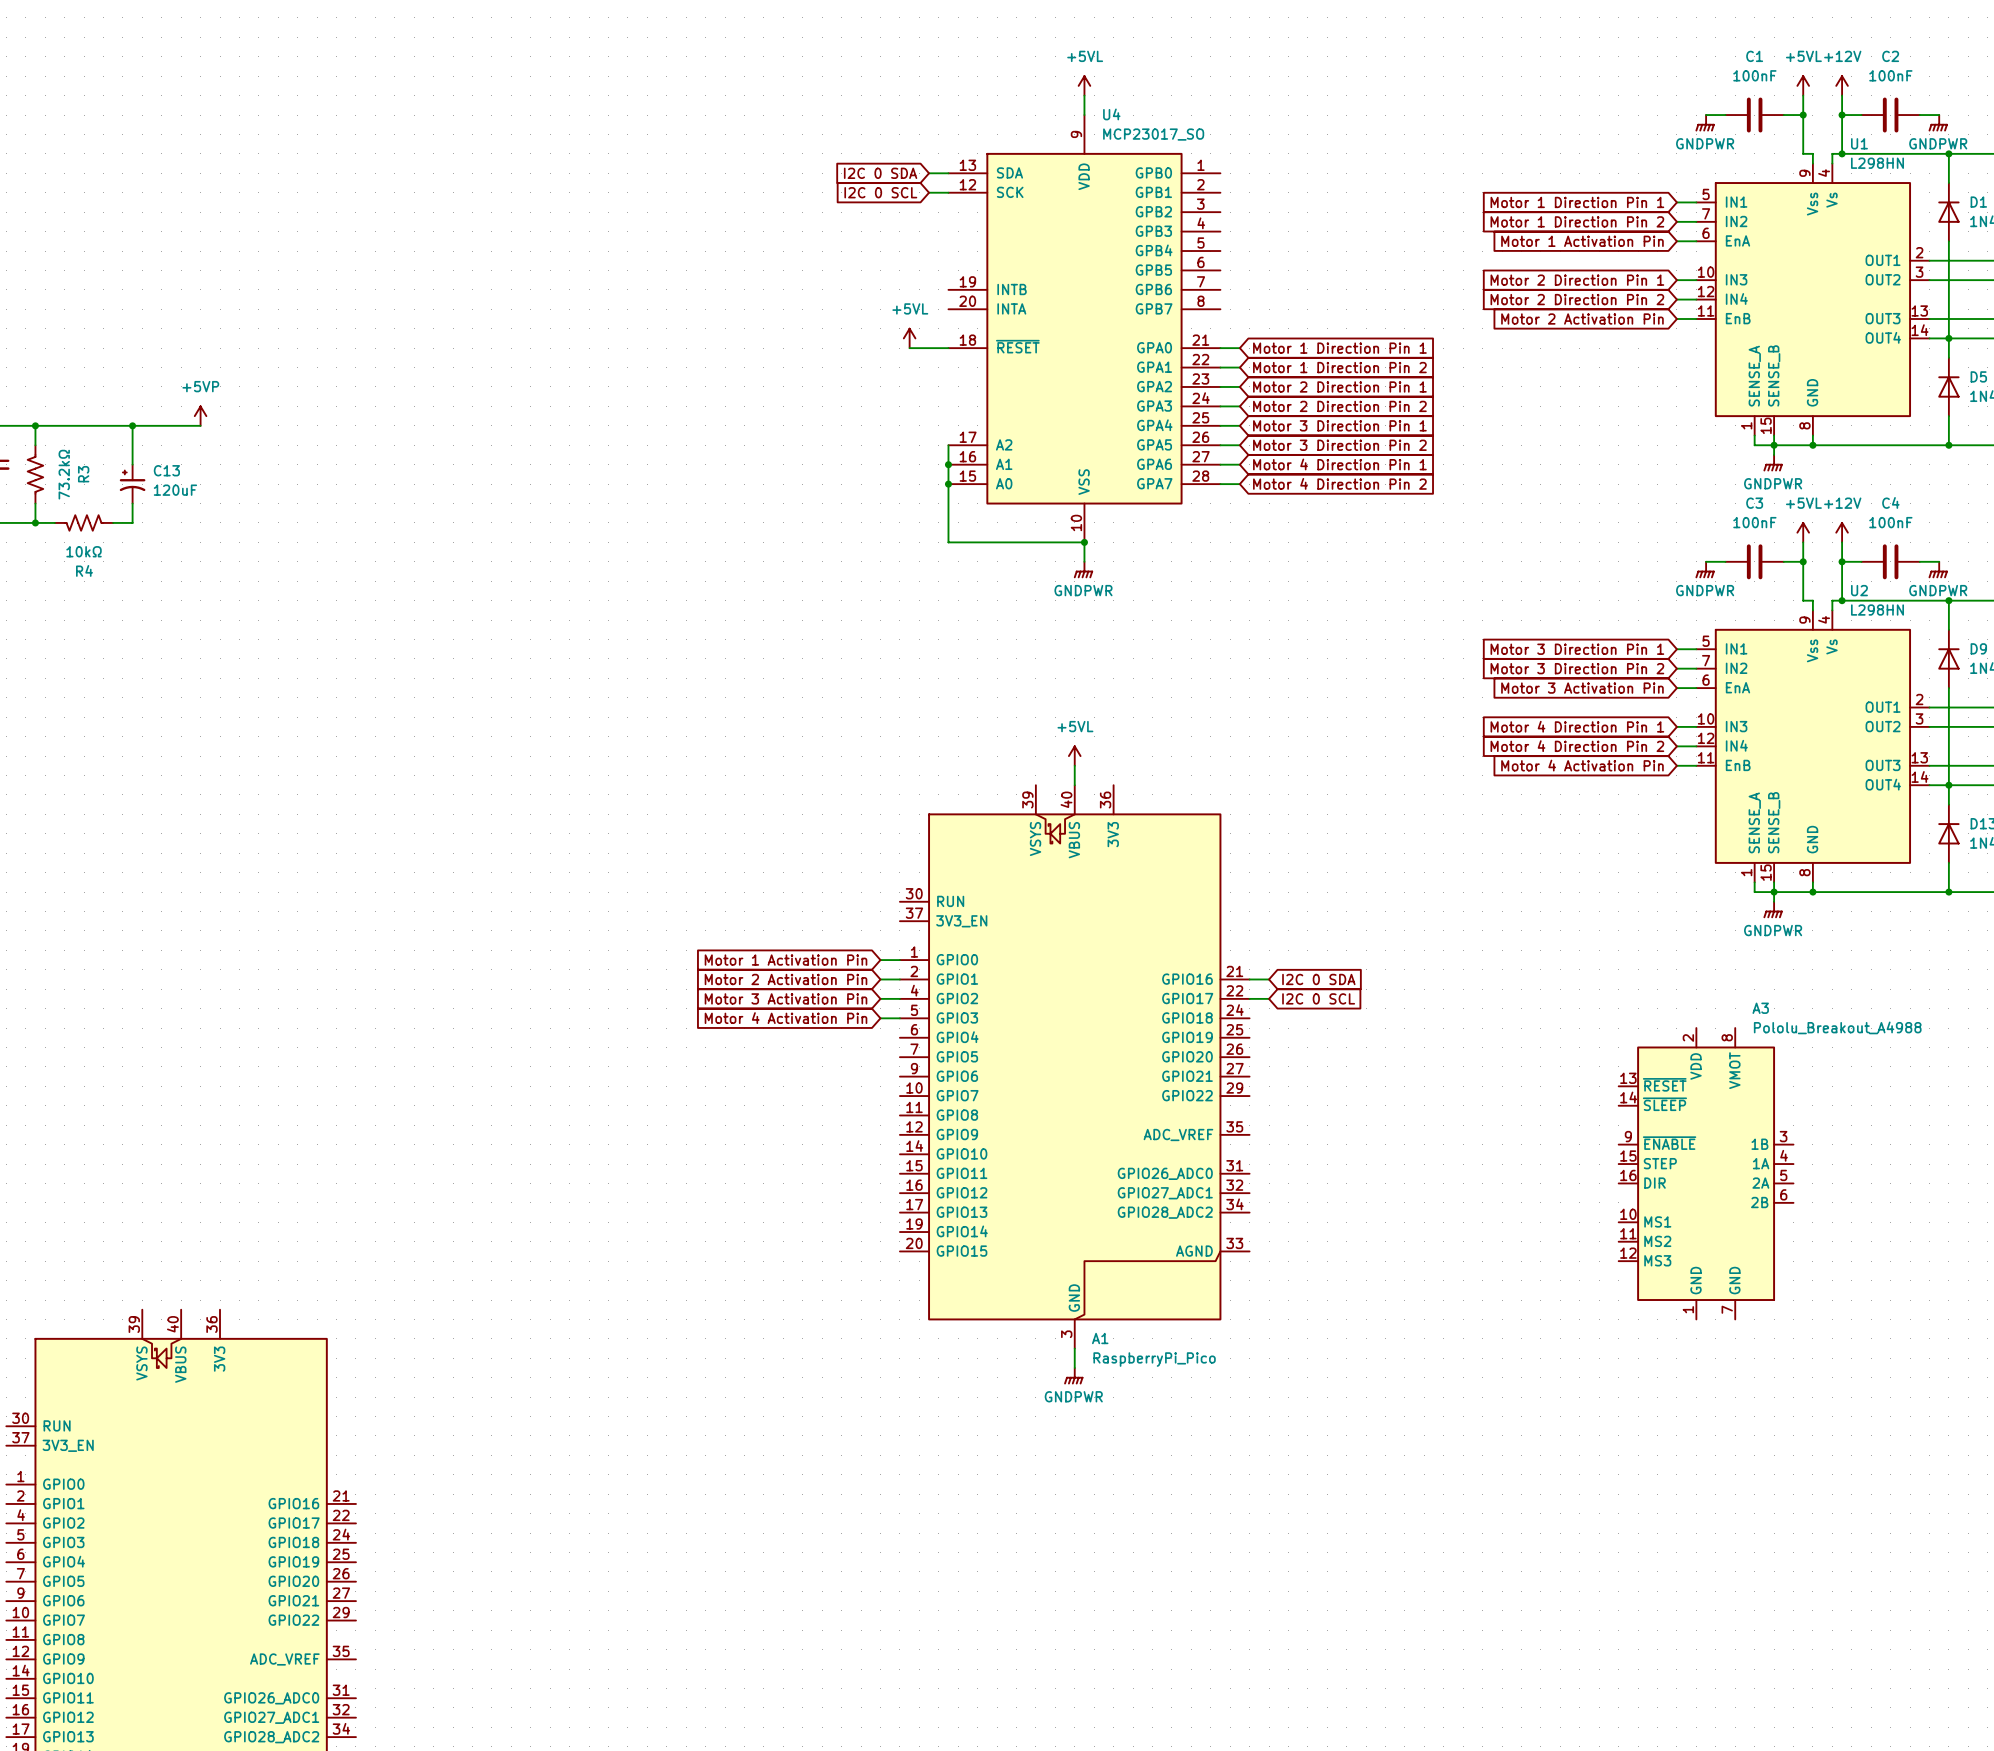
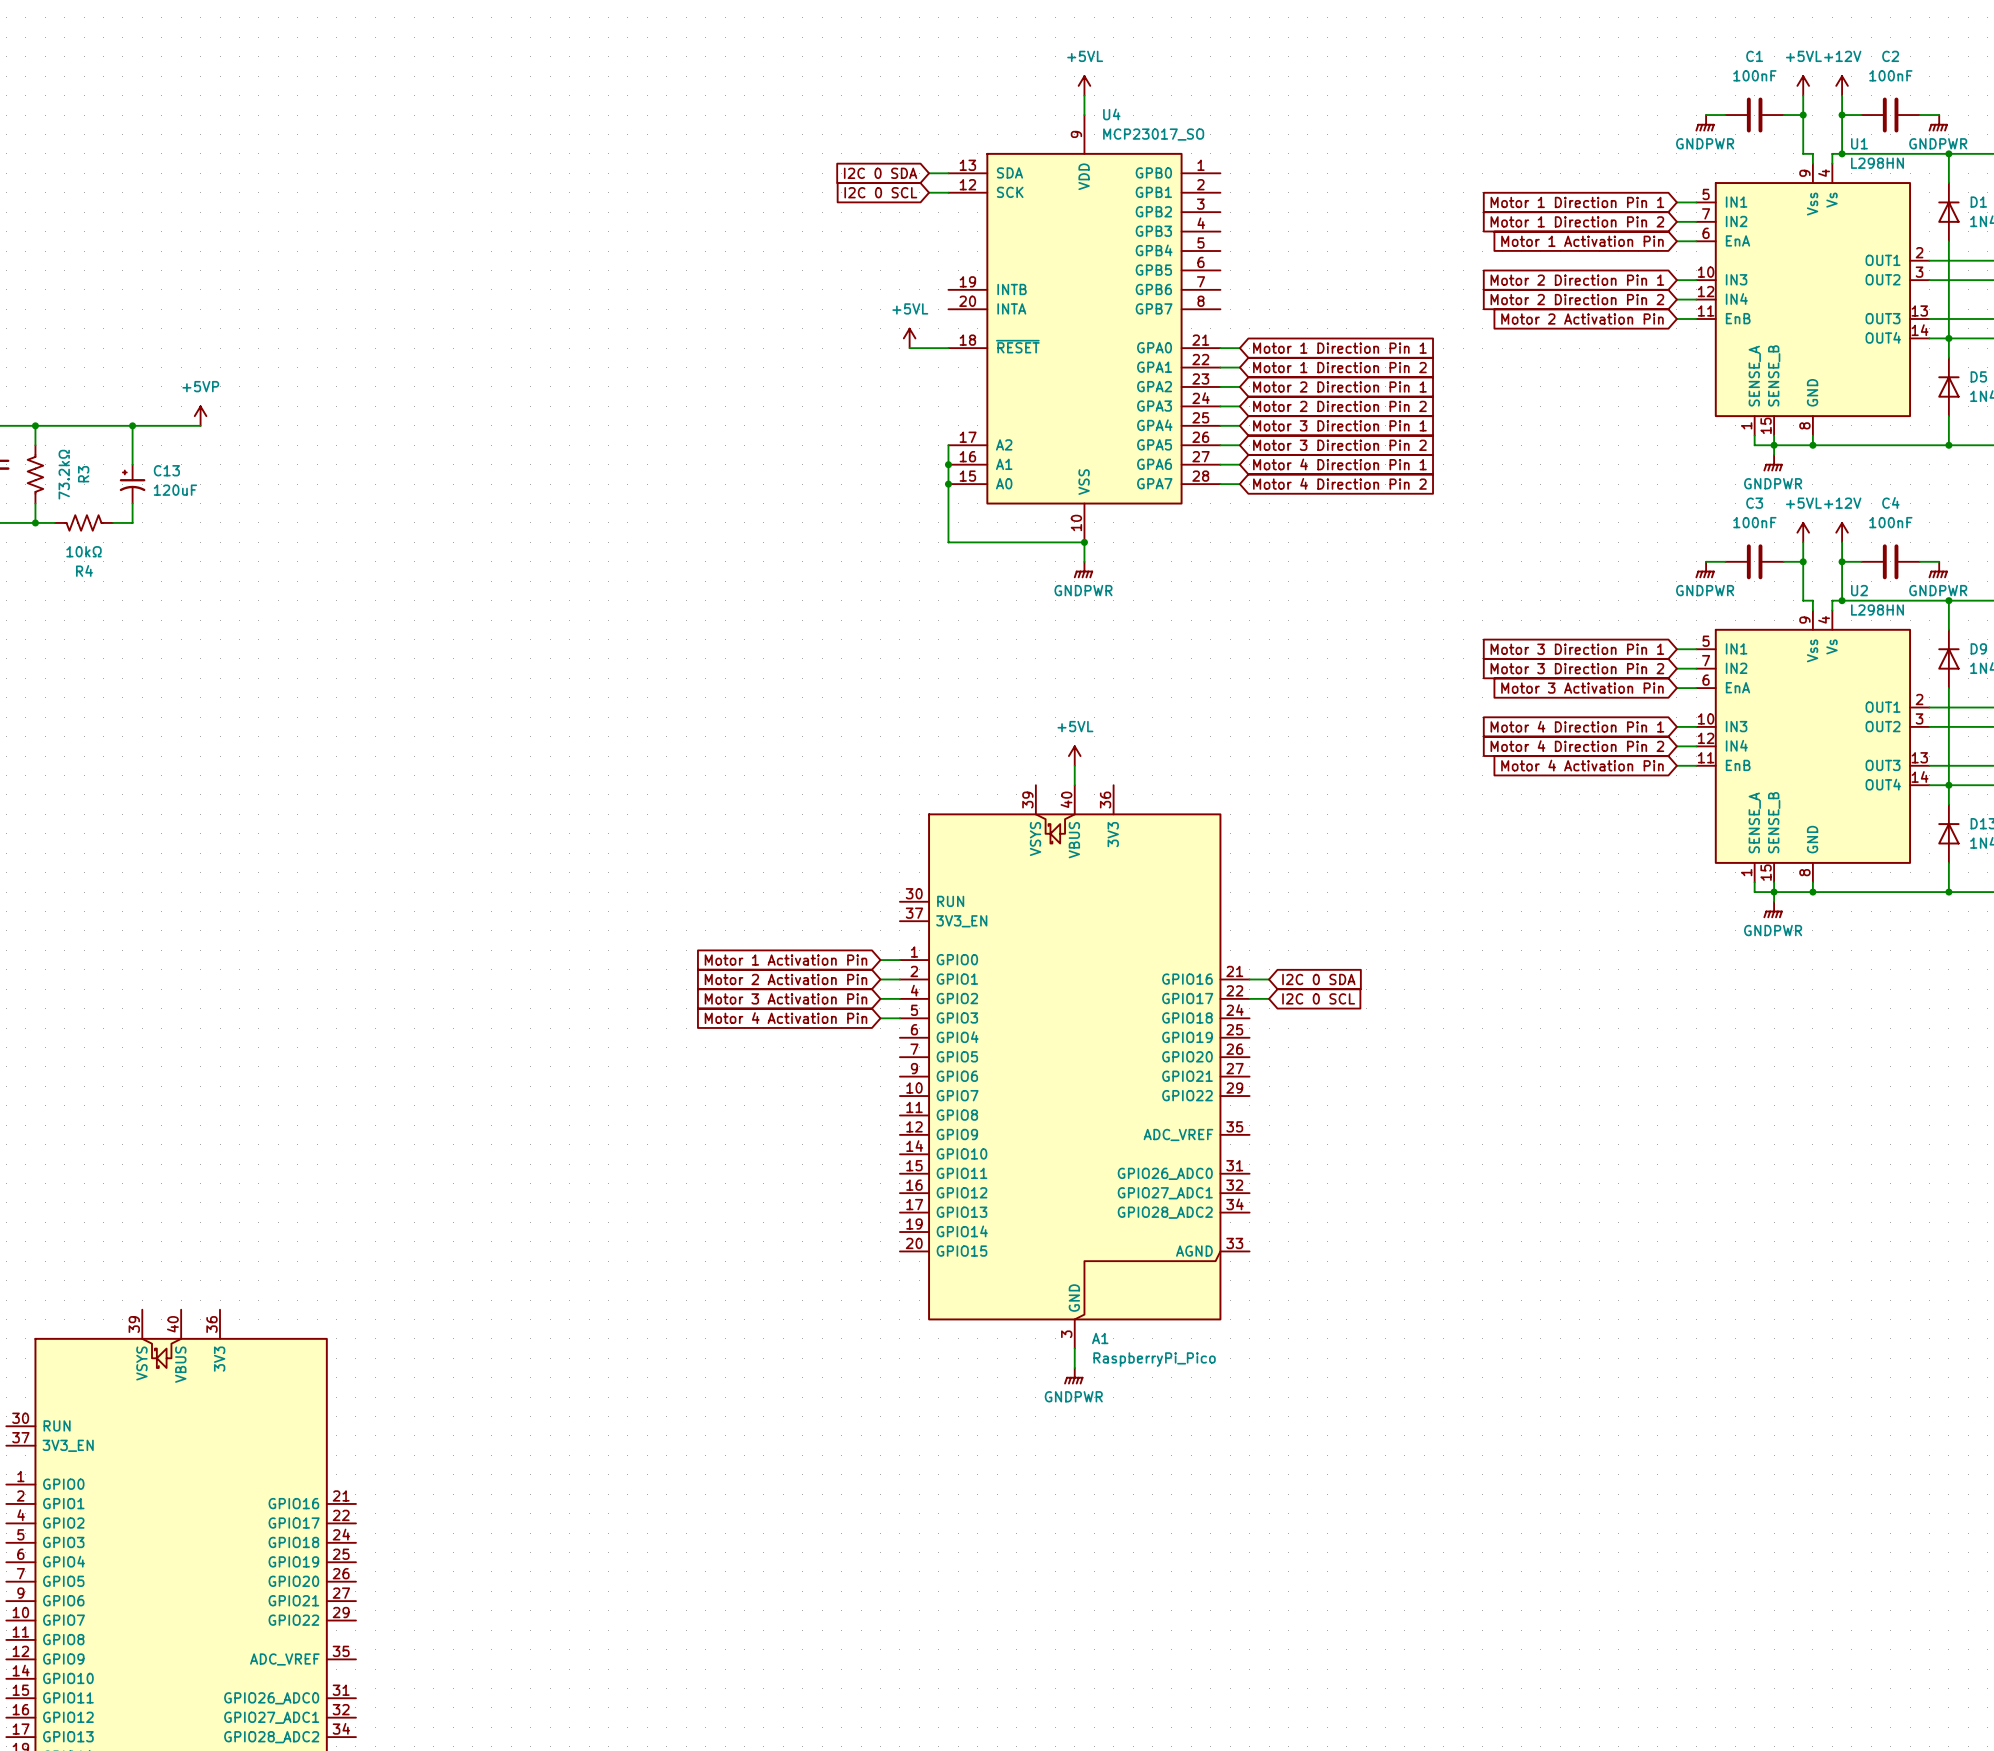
A3: Pololu_Breakout_A4988 (1706, 1173) -> none

